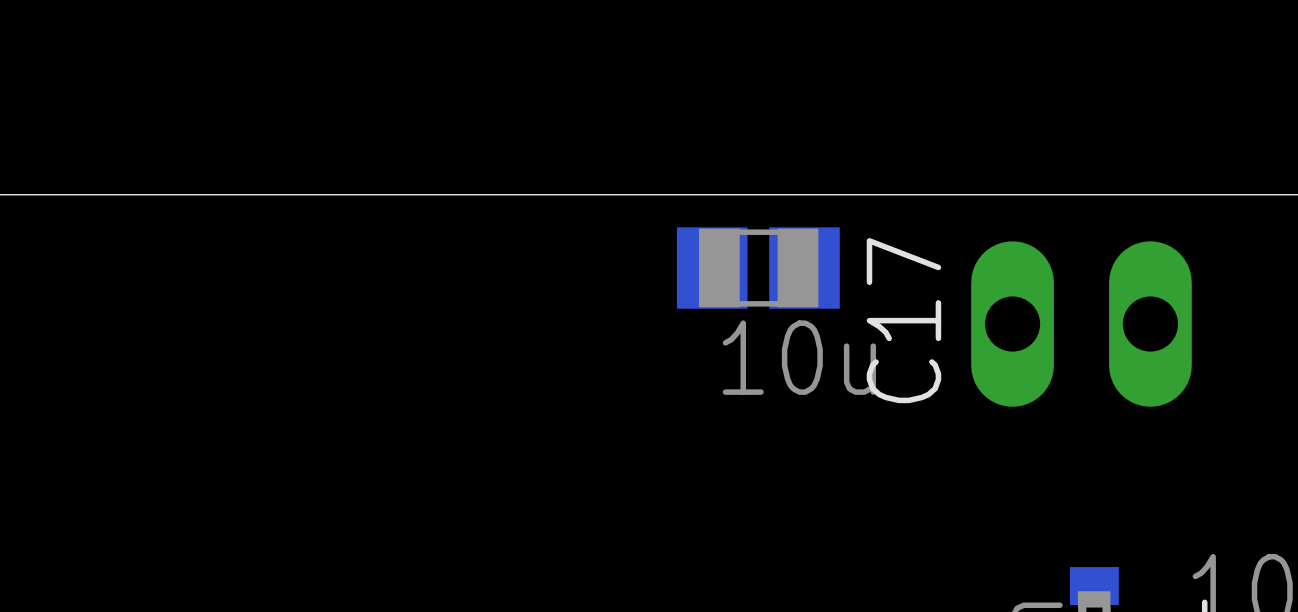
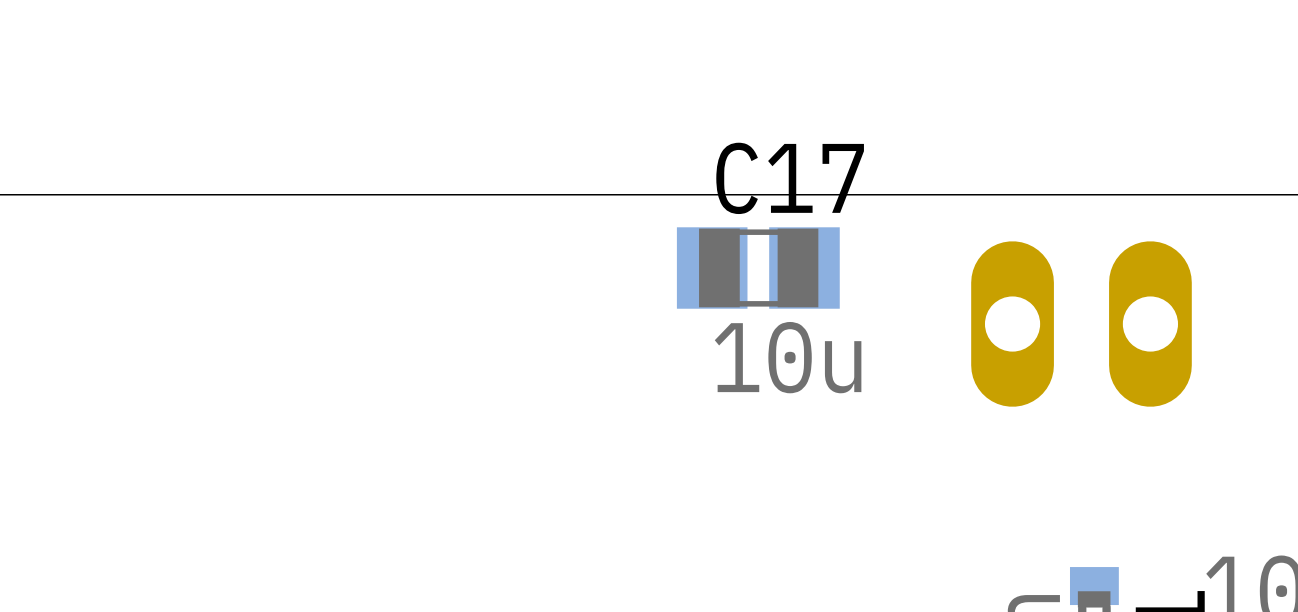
C17 name rotation: 0° (903, 320) -> 90° clockwise (790, 178)

